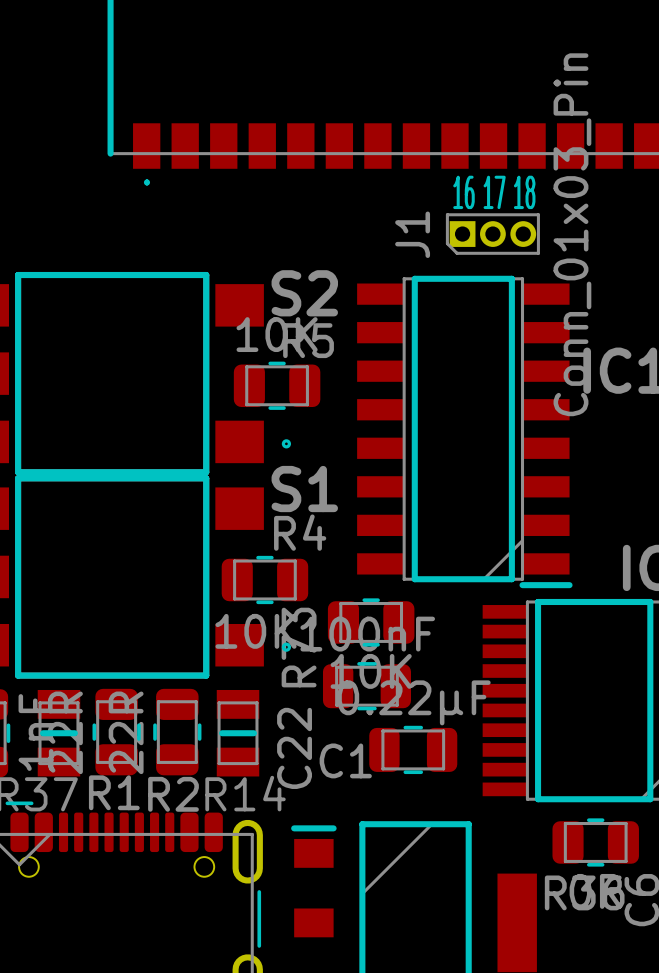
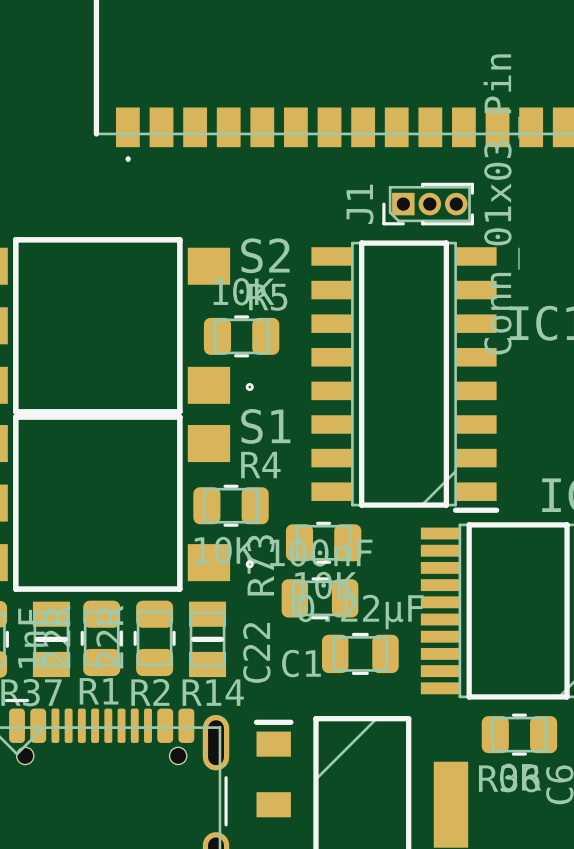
text: 16 (463, 192) -> none
text: 17 (494, 192) -> none
text: 18 (524, 192) -> none
J1 footprint: [445, 213, 540, 255] -> [382, 182, 475, 226]

